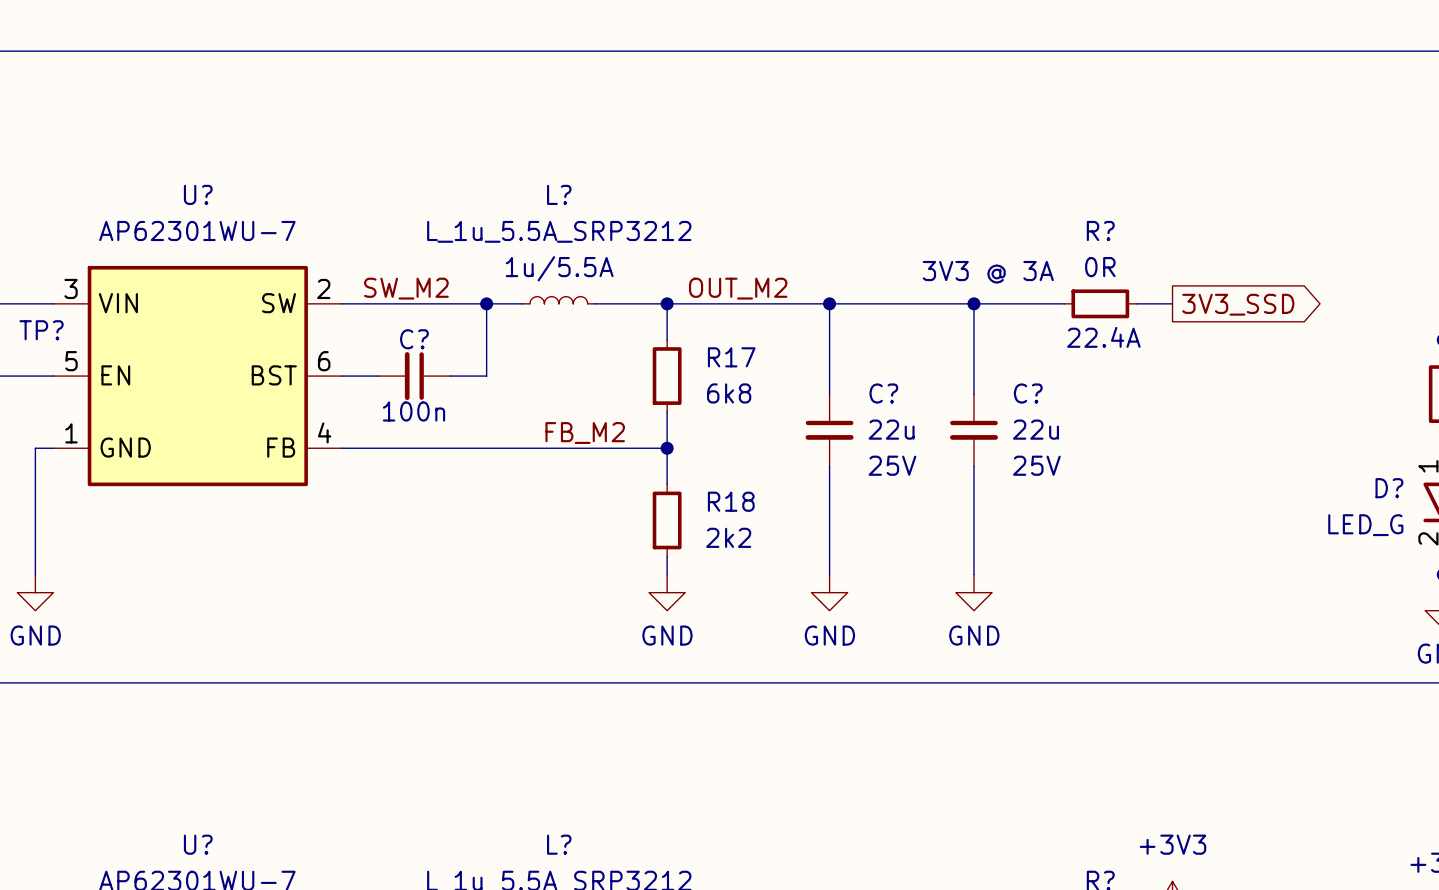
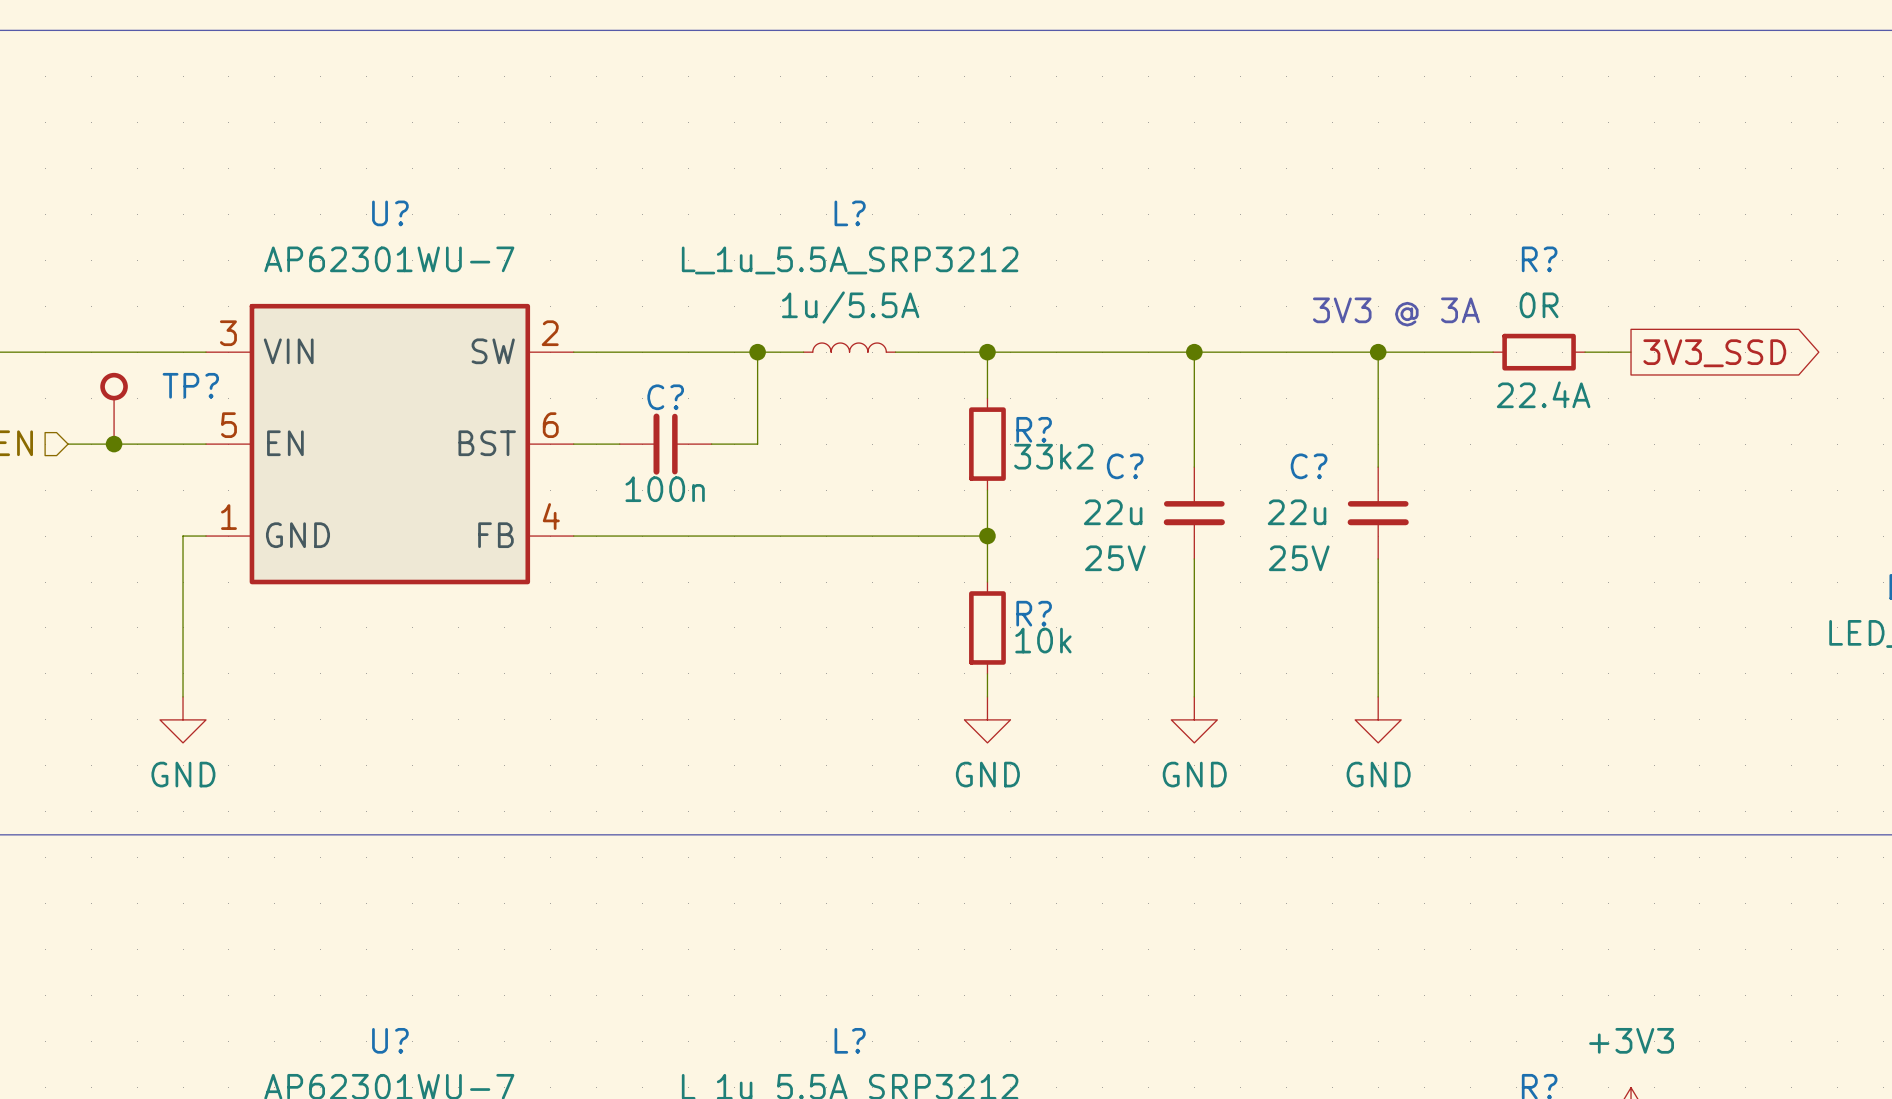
label: SW_M2 (406, 288) -> none
label: OUT_M2 (738, 288) -> none
R17 name: R17 (731, 357) -> R? (1034, 429)
R17 text: 6k8 (729, 393) -> 33k2 (1053, 456)
C? name position: C? (883, 393) -> C? (1125, 466)
C? name position: C? (1028, 393) -> C? (1309, 466)
C? text position: 22u (891, 429) -> 22u (1113, 512)
C? text position: 22u (1036, 429) -> 22u (1297, 512)
label: FB_M2 (585, 433) -> none
C? text position: 25V (892, 465) -> 25V (1115, 558)
C? text position: 25V (1036, 465) -> 25V (1299, 558)
R18 name: R18 (731, 501) -> R? (1034, 613)
R18 text: 2k2 (728, 537) -> 10k (1043, 640)

